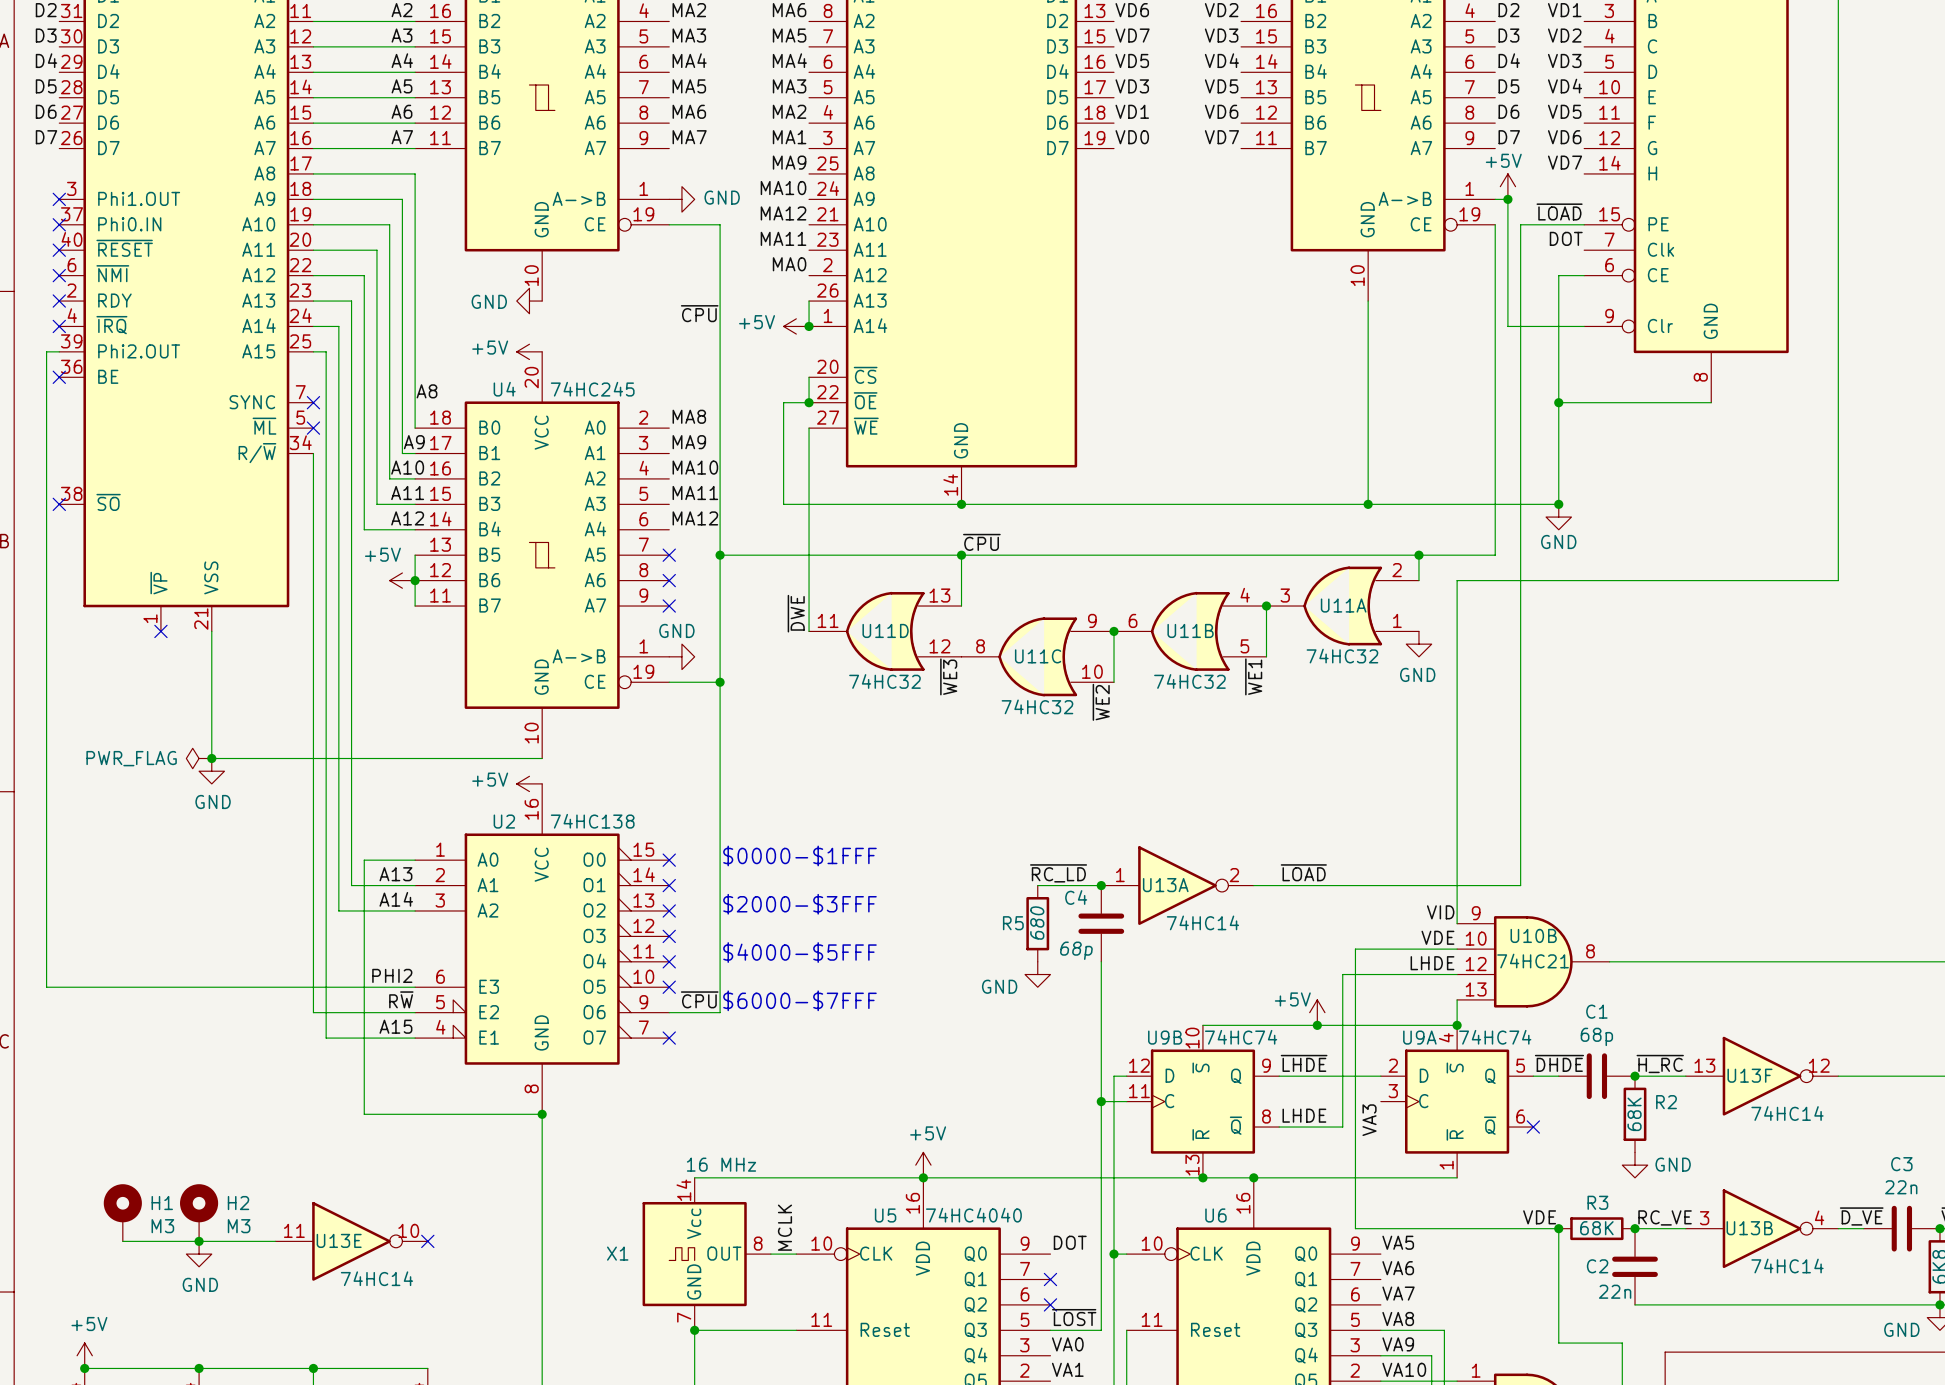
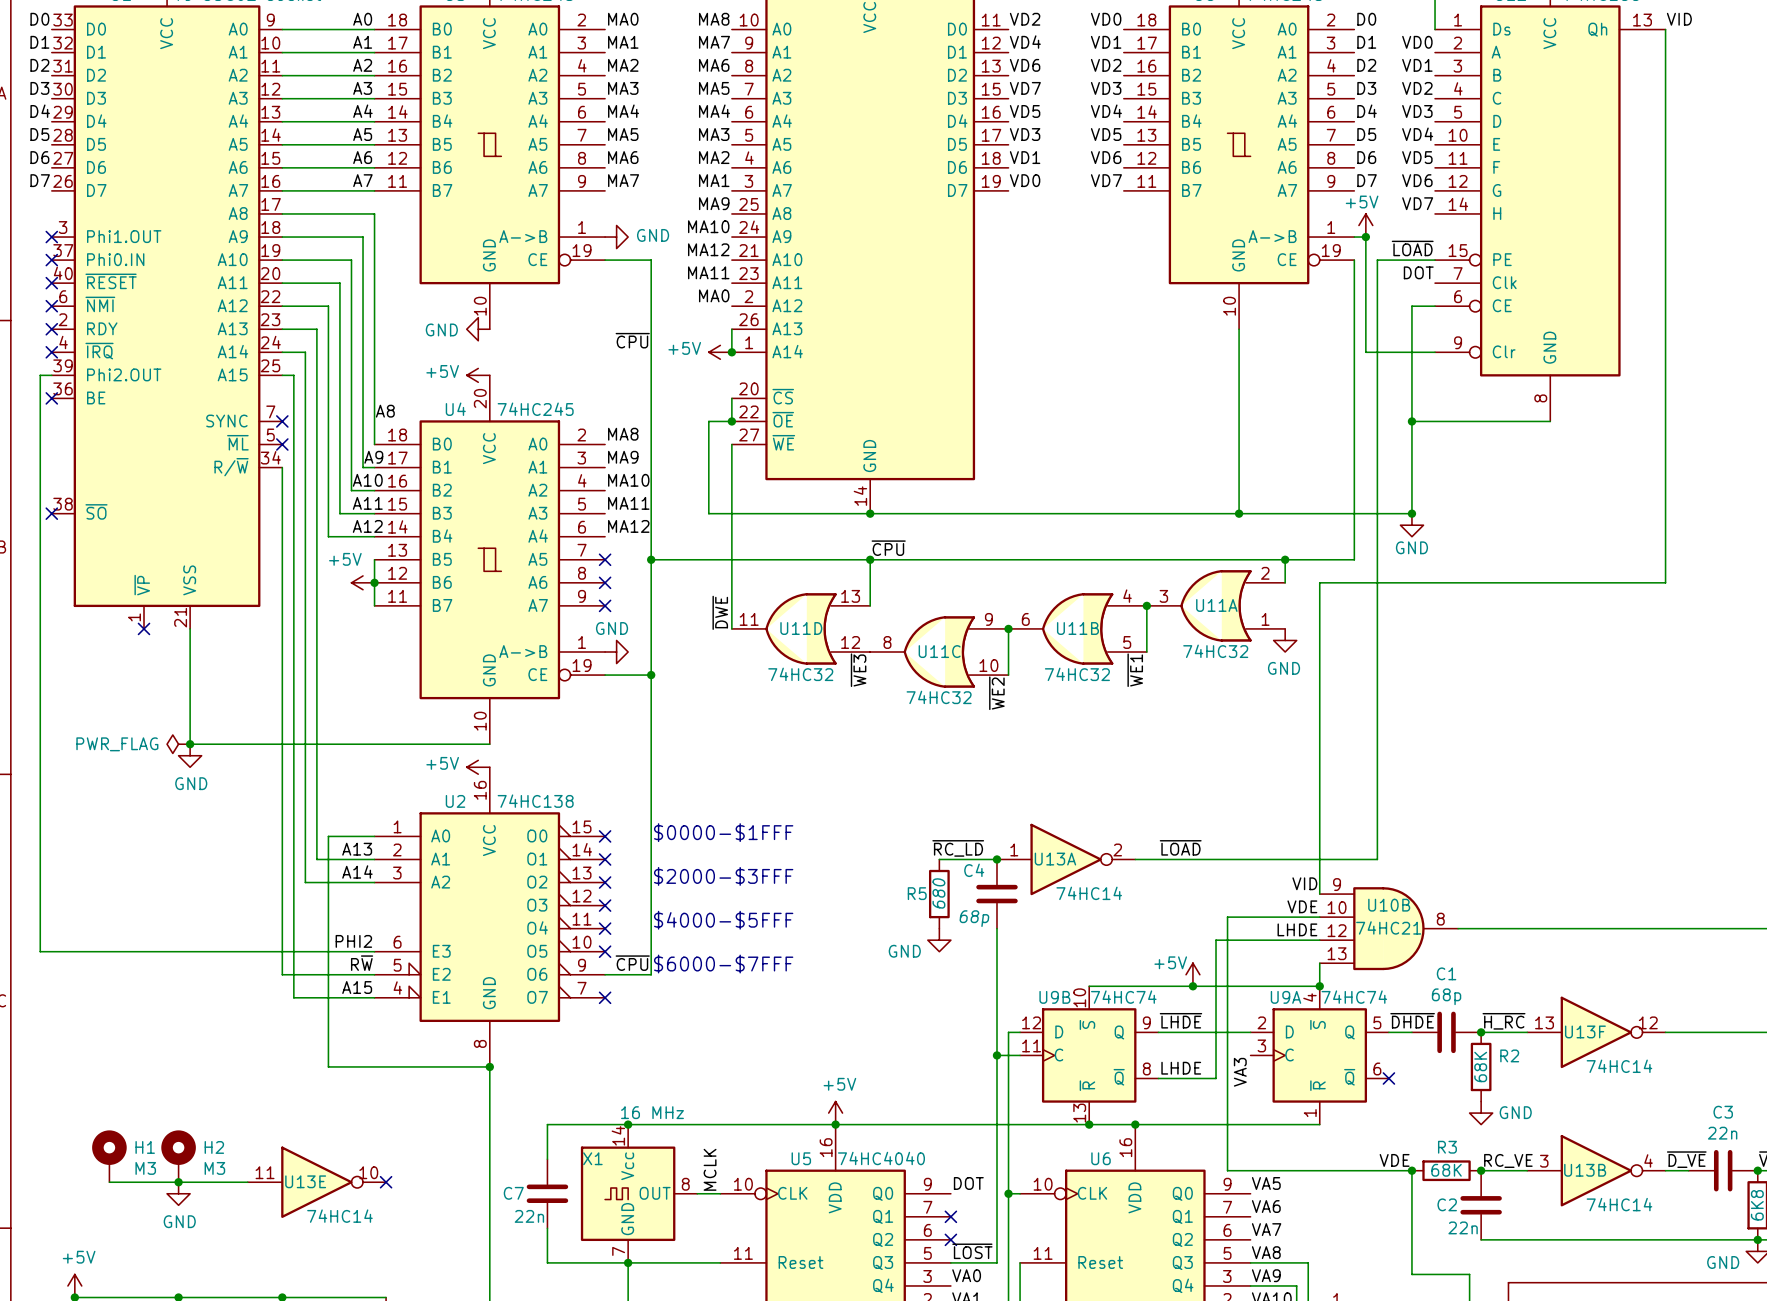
wire: none -> (628, 1124) (547, 1124) (547, 1159)
junction: none -> (628, 1124)
X1 name position: X1 (617, 1253) -> X1 (592, 1158)
C7: none -> 22n (547, 1193)
wire: none -> (547, 1228) (547, 1262) (628, 1262)

